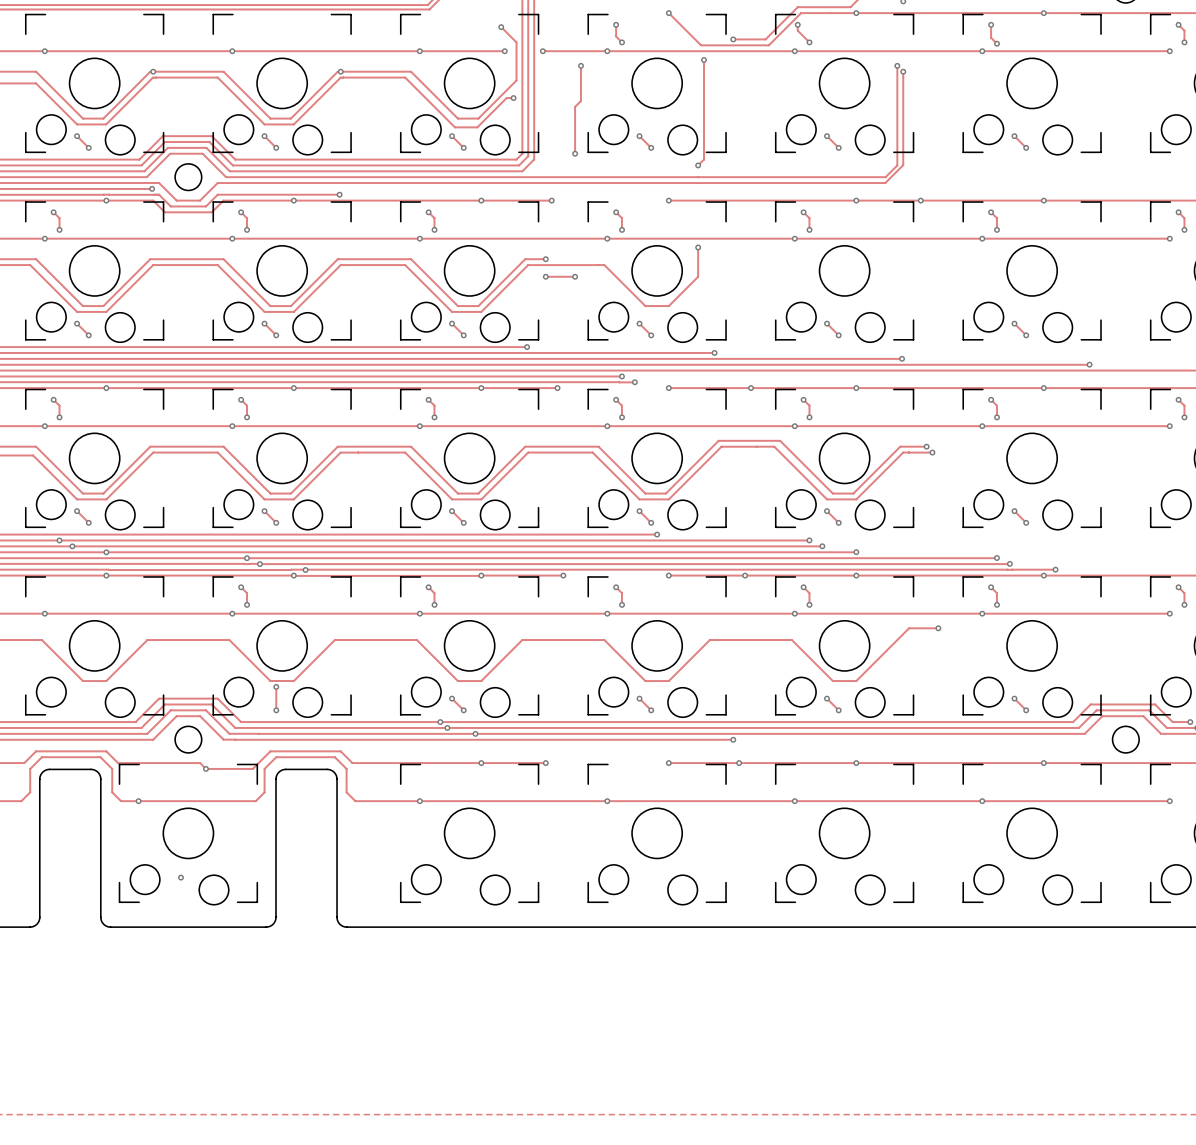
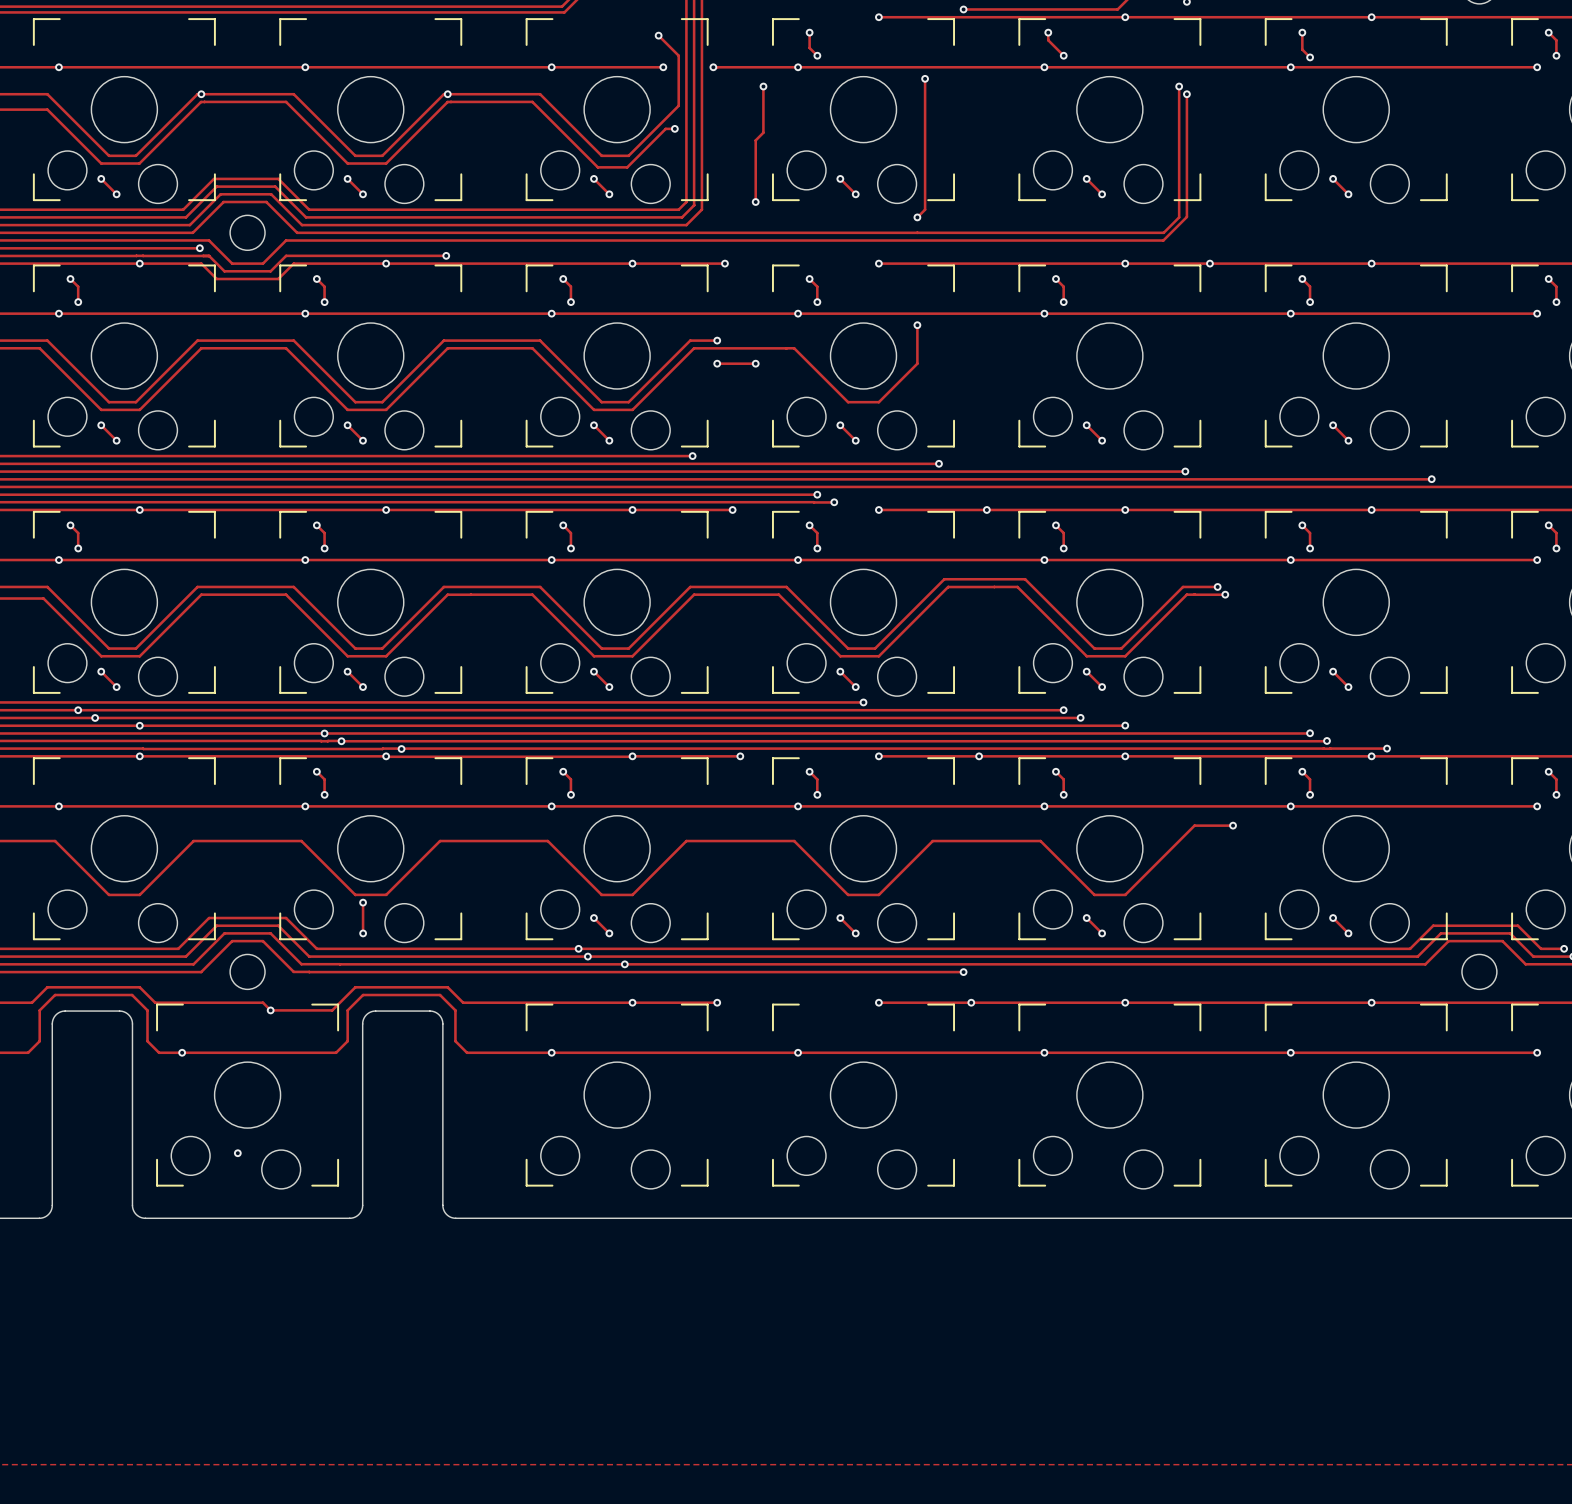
track: (797, 7) (765, 39) (733, 39) -> (1048, 9) (963, 9)
track: (668, 13) (701, 45) (768, 45) (801, 13) -> (878, 17) (1052, 17)
via position: (733, 39) -> (963, 9)

